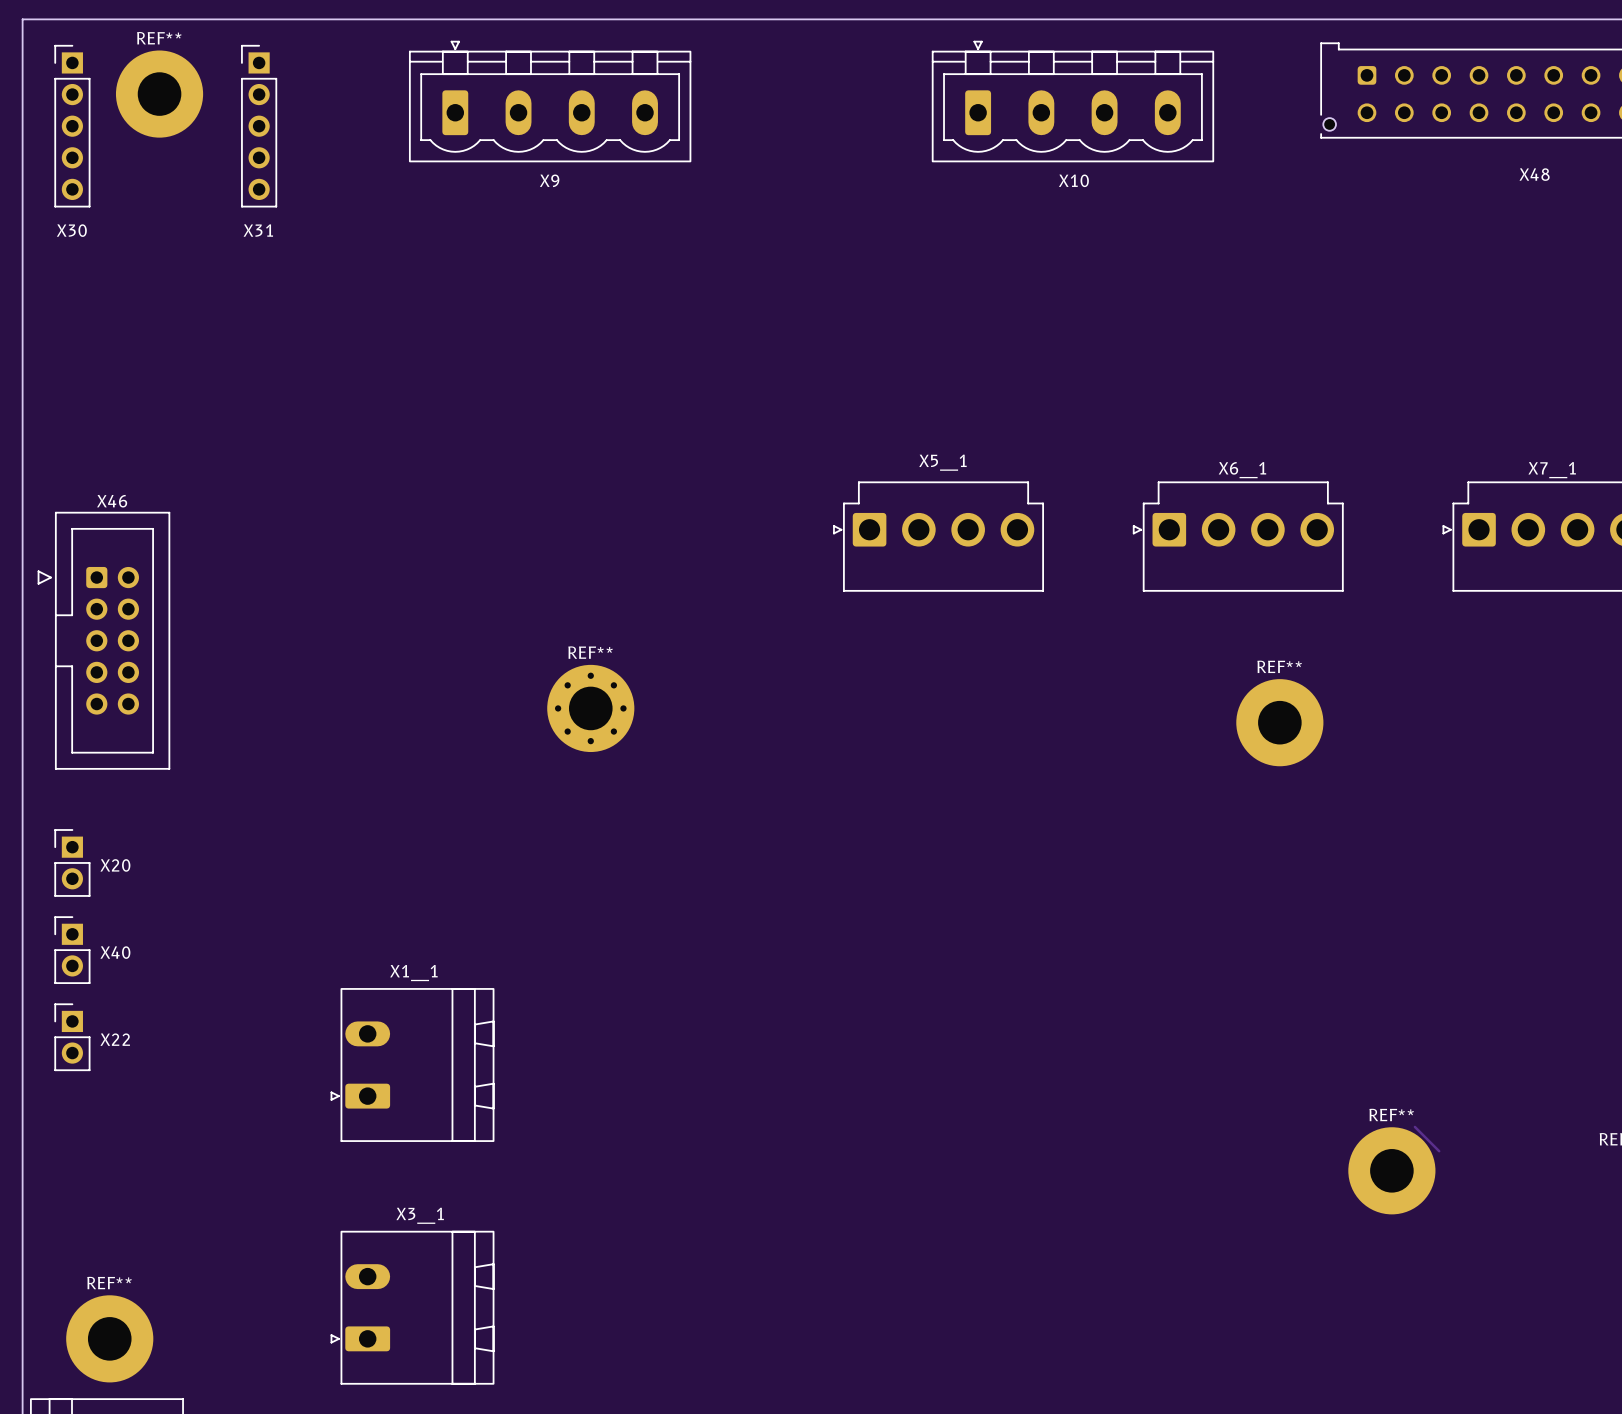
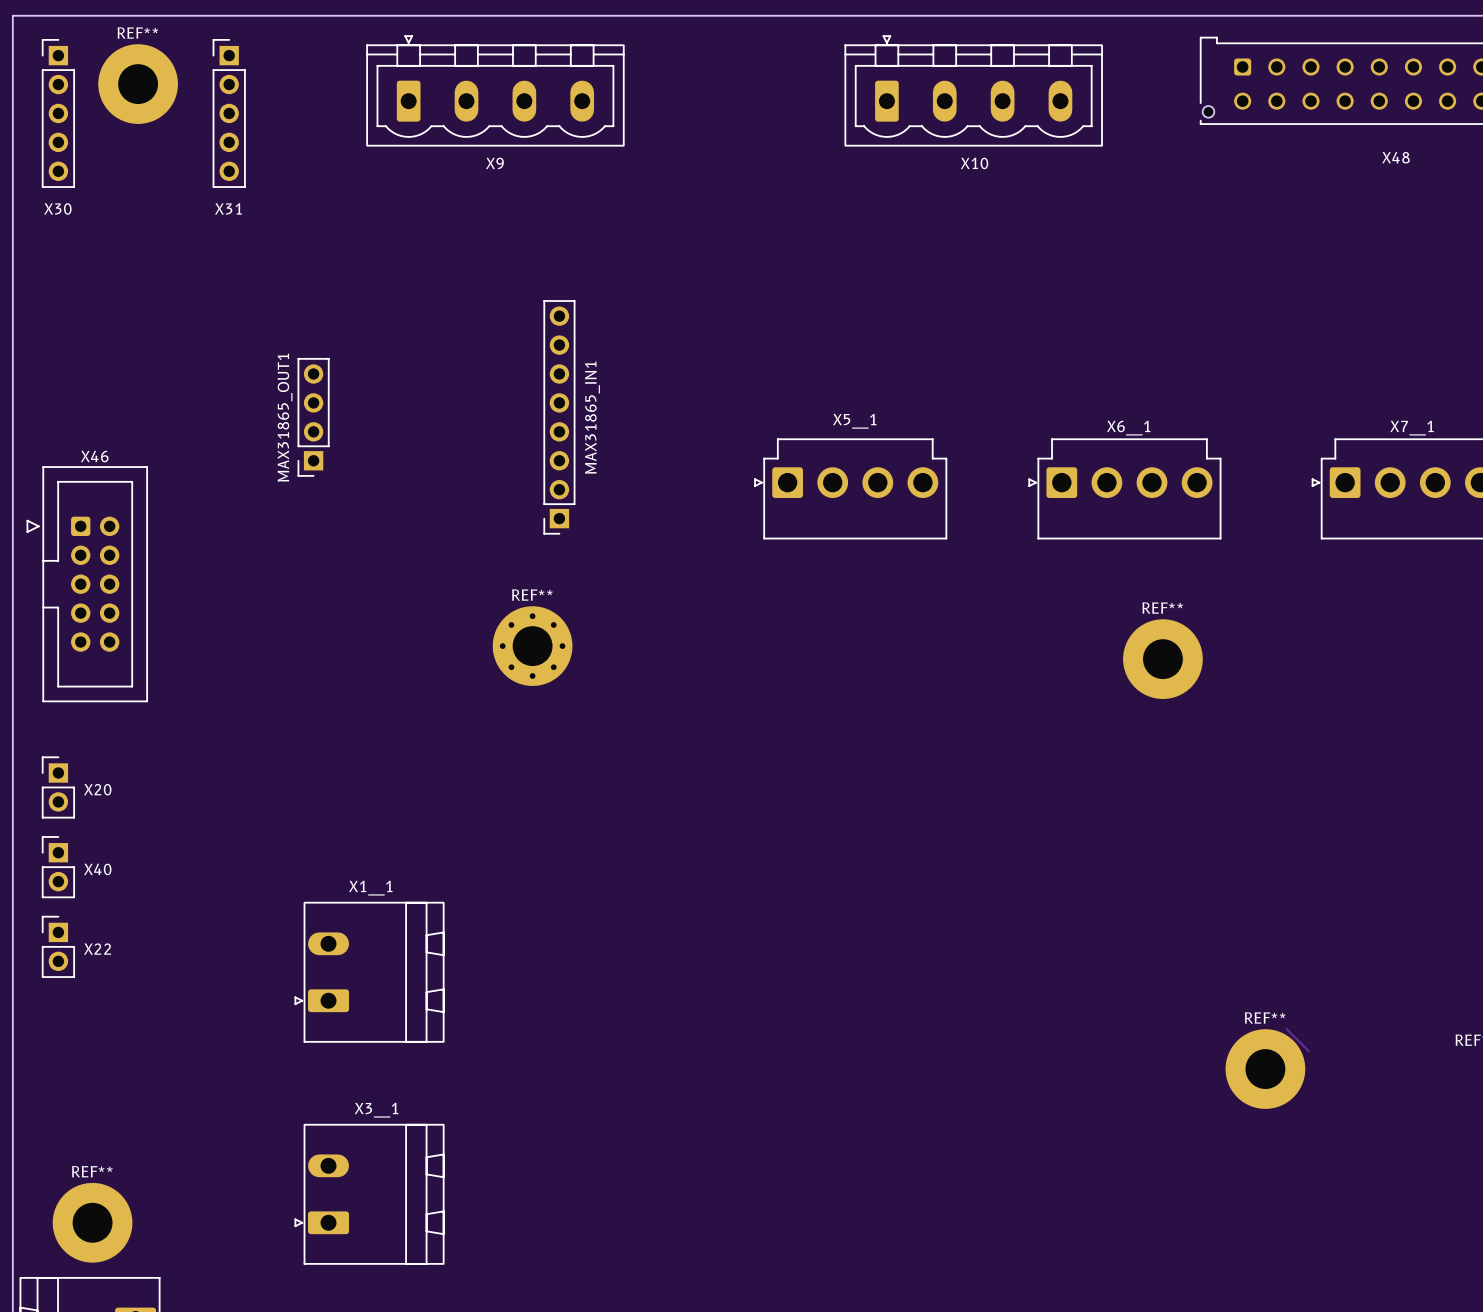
MAX31865_OUT1: none -> (313, 417)
MAX31865_IN1: none -> (559, 417)

